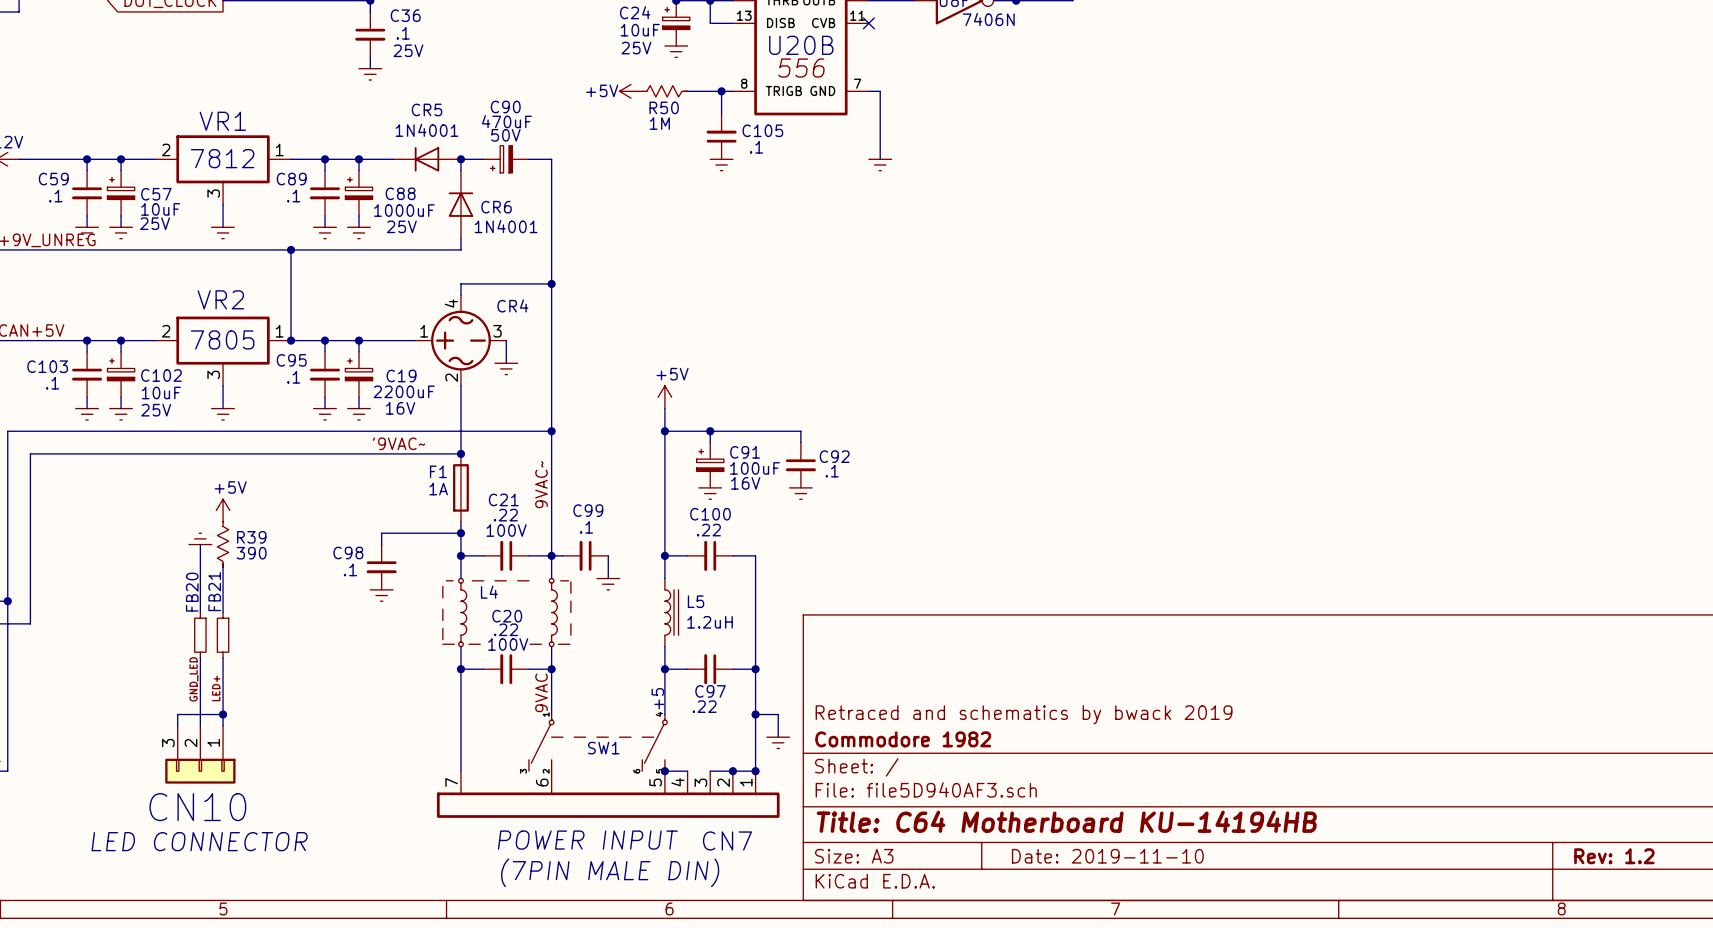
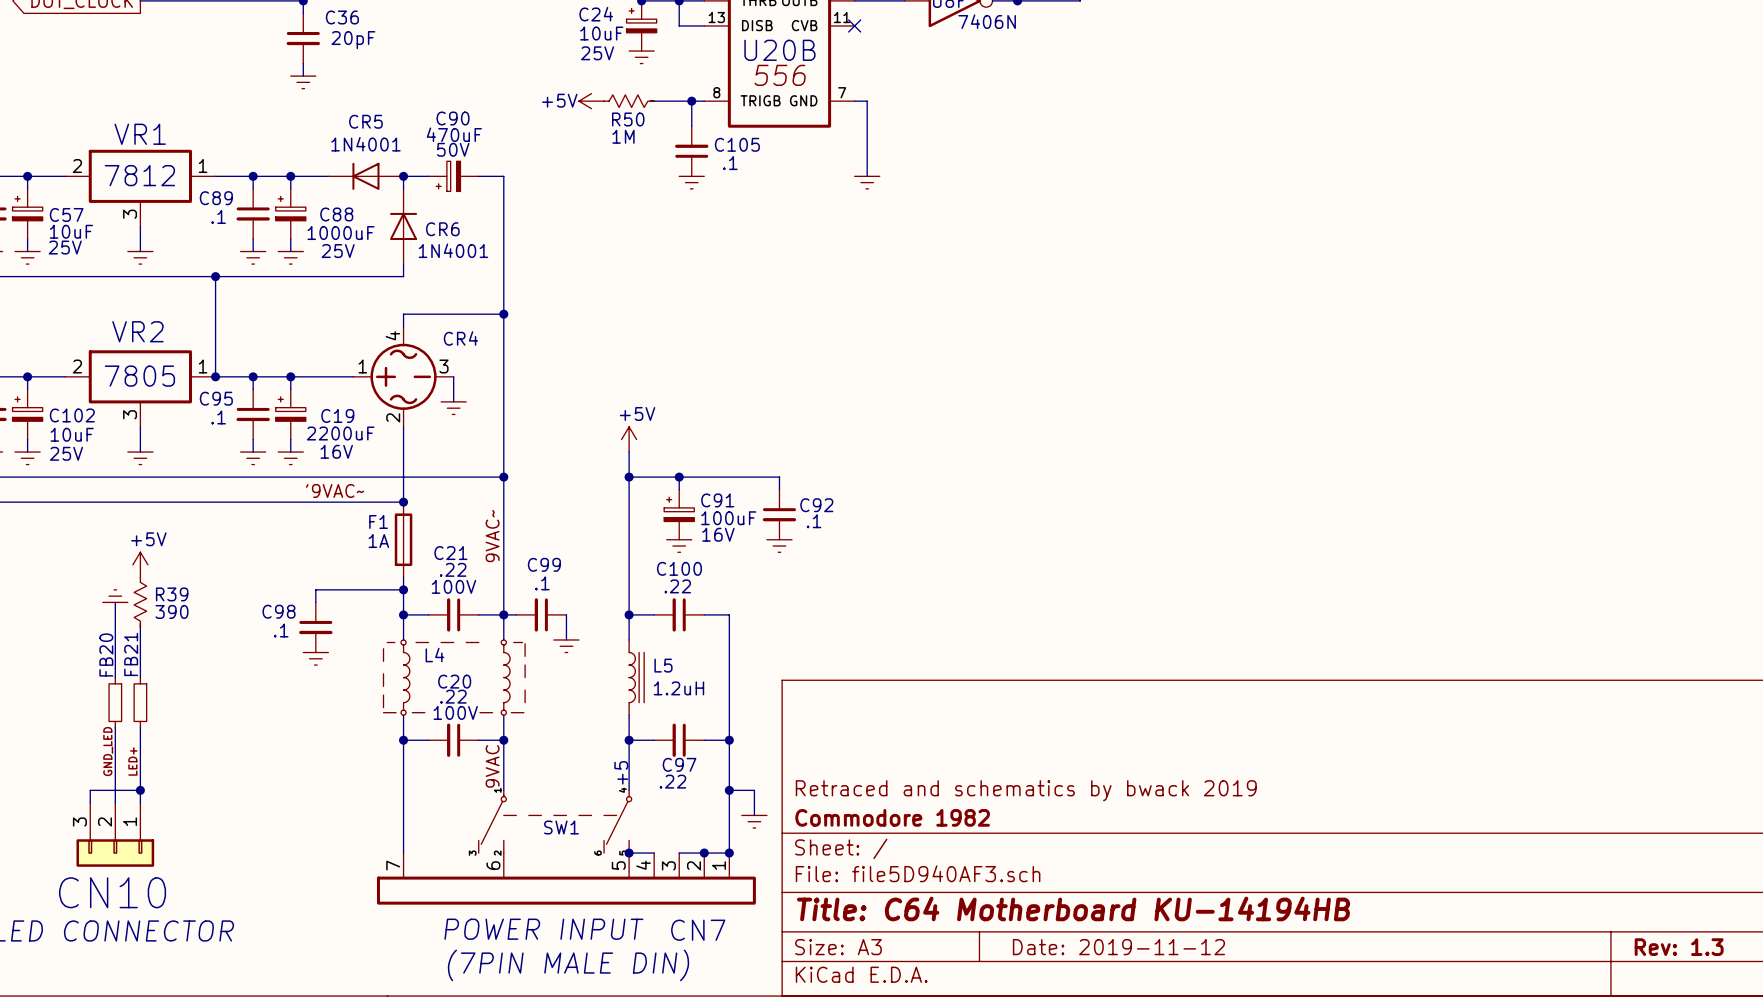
C36 value: .1 (403, 33) -> 20pF (353, 40)
text: 25V (408, 50) -> none
title block: Date: 2019-11-10 (1107, 856) -> Date: 2019-11-12 (1118, 947)
title block: Rev: 1.2 (1614, 856) -> Rev: 1.3 (1679, 947)

